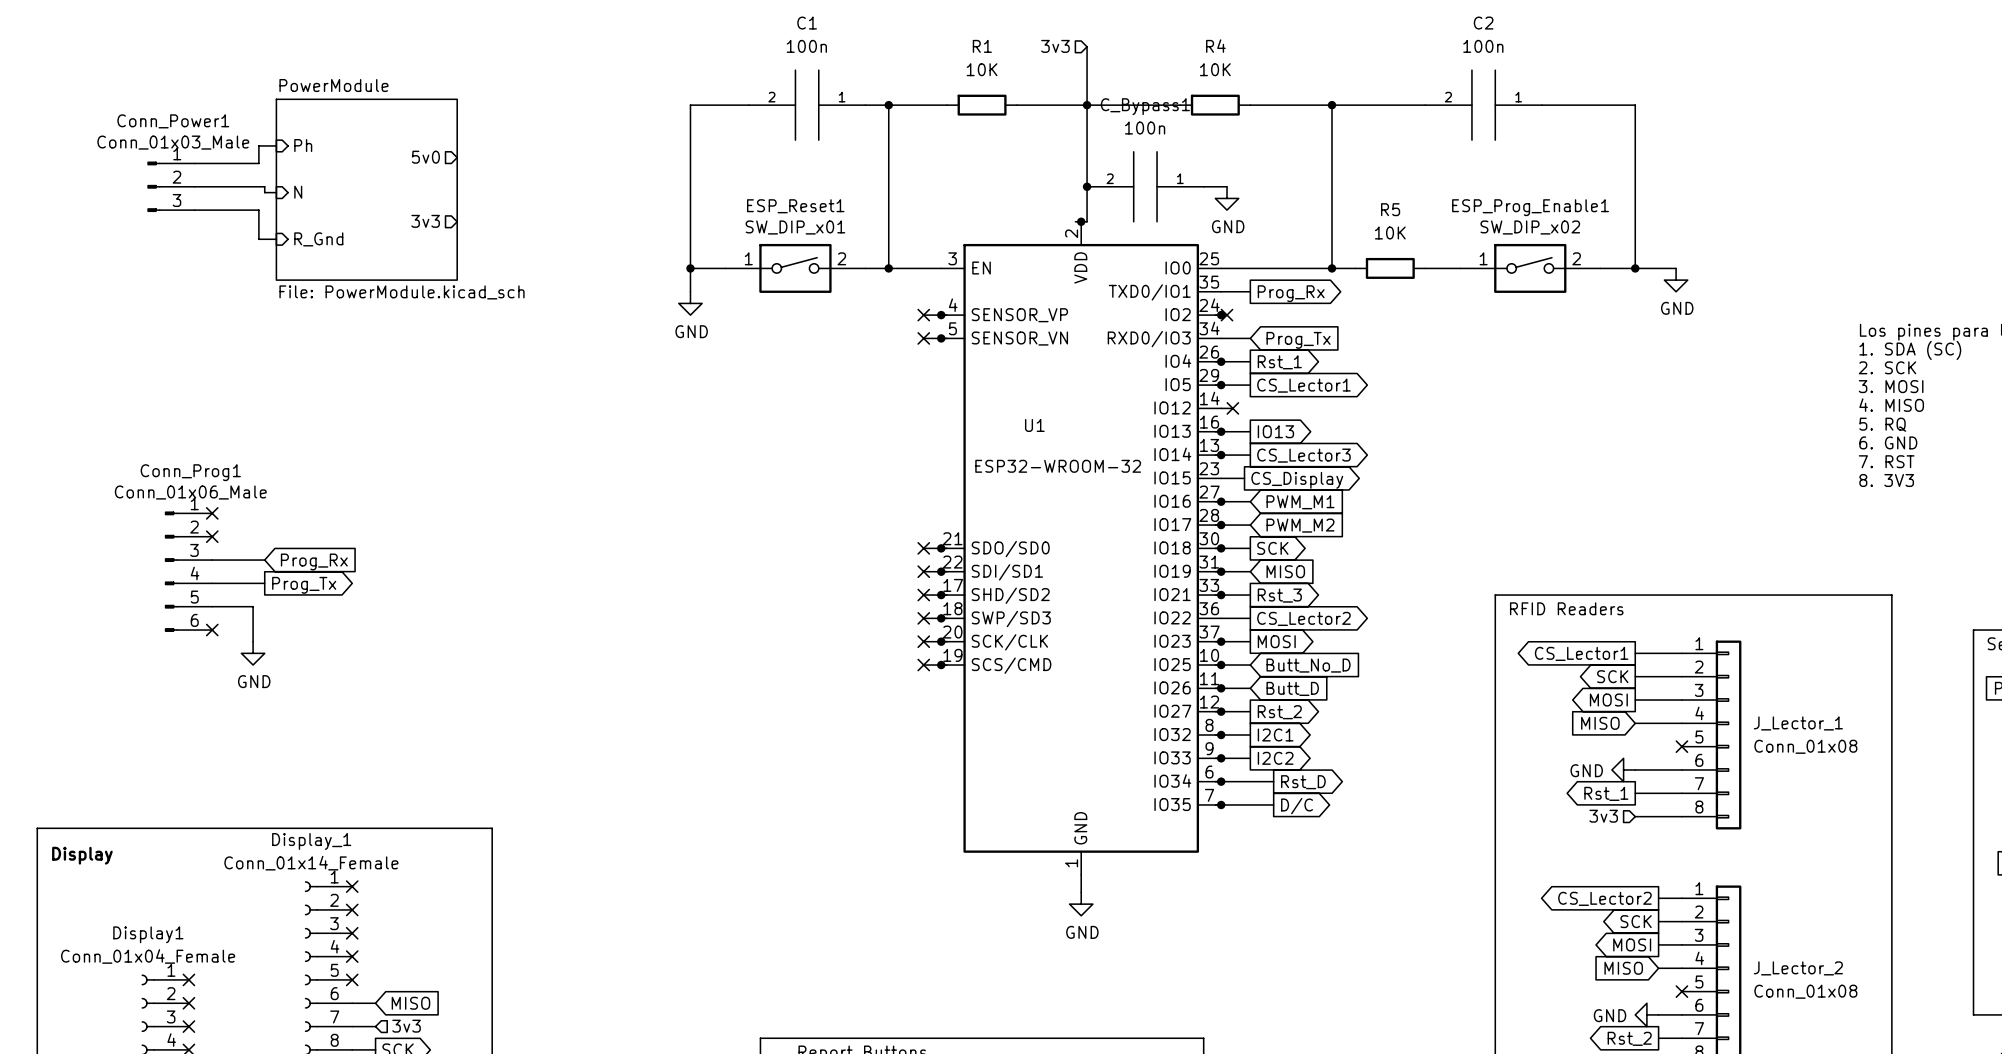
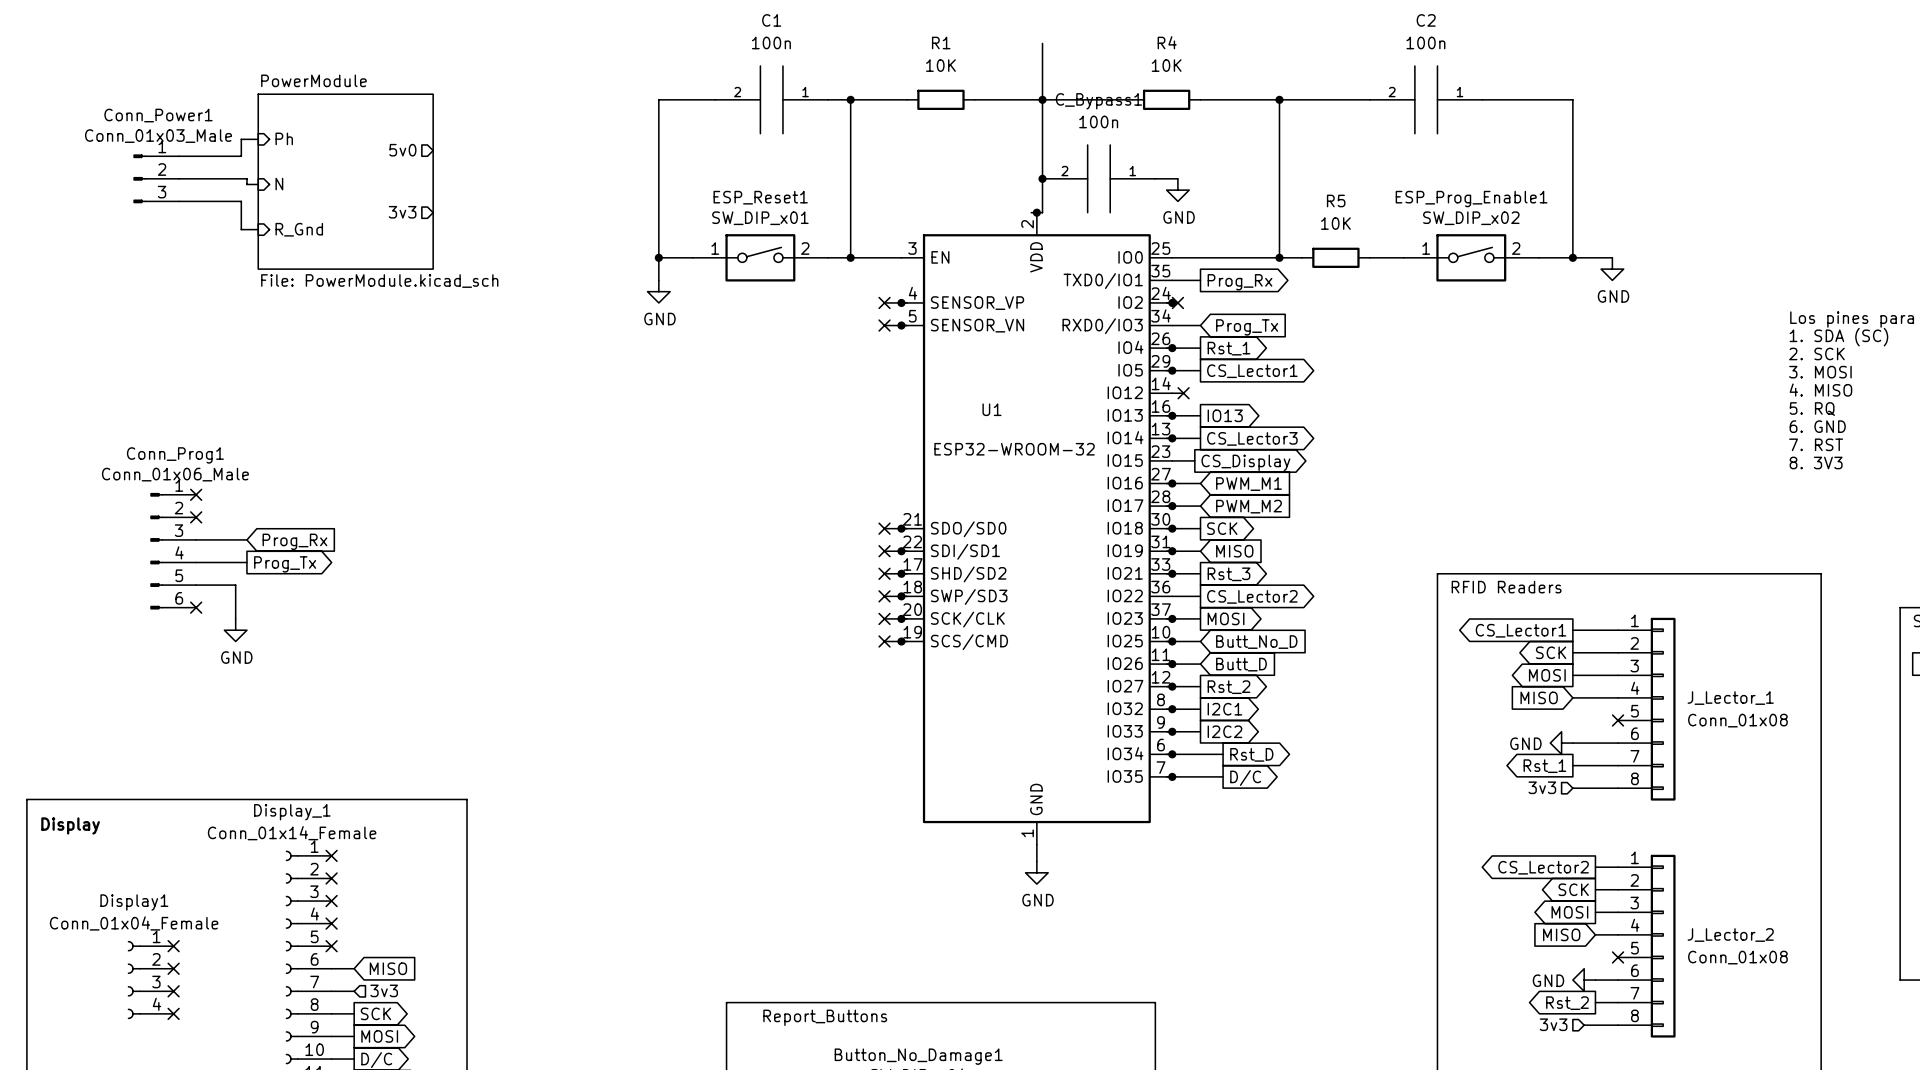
hierarchical label: 3v3 (1055, 46) -> none

